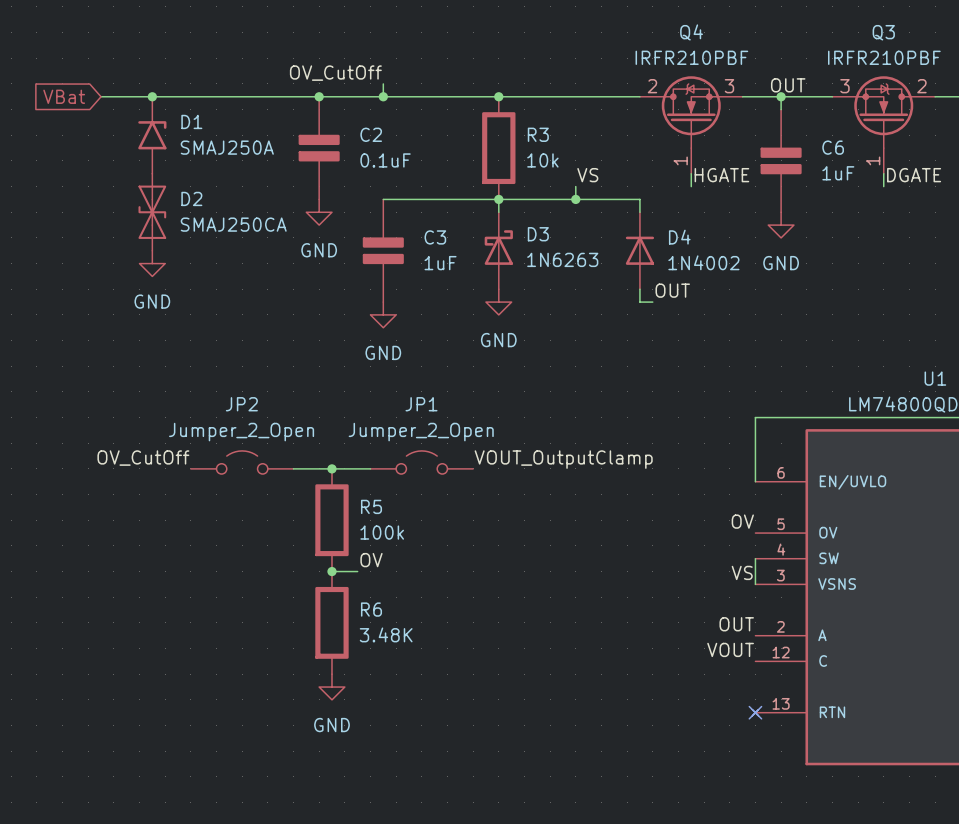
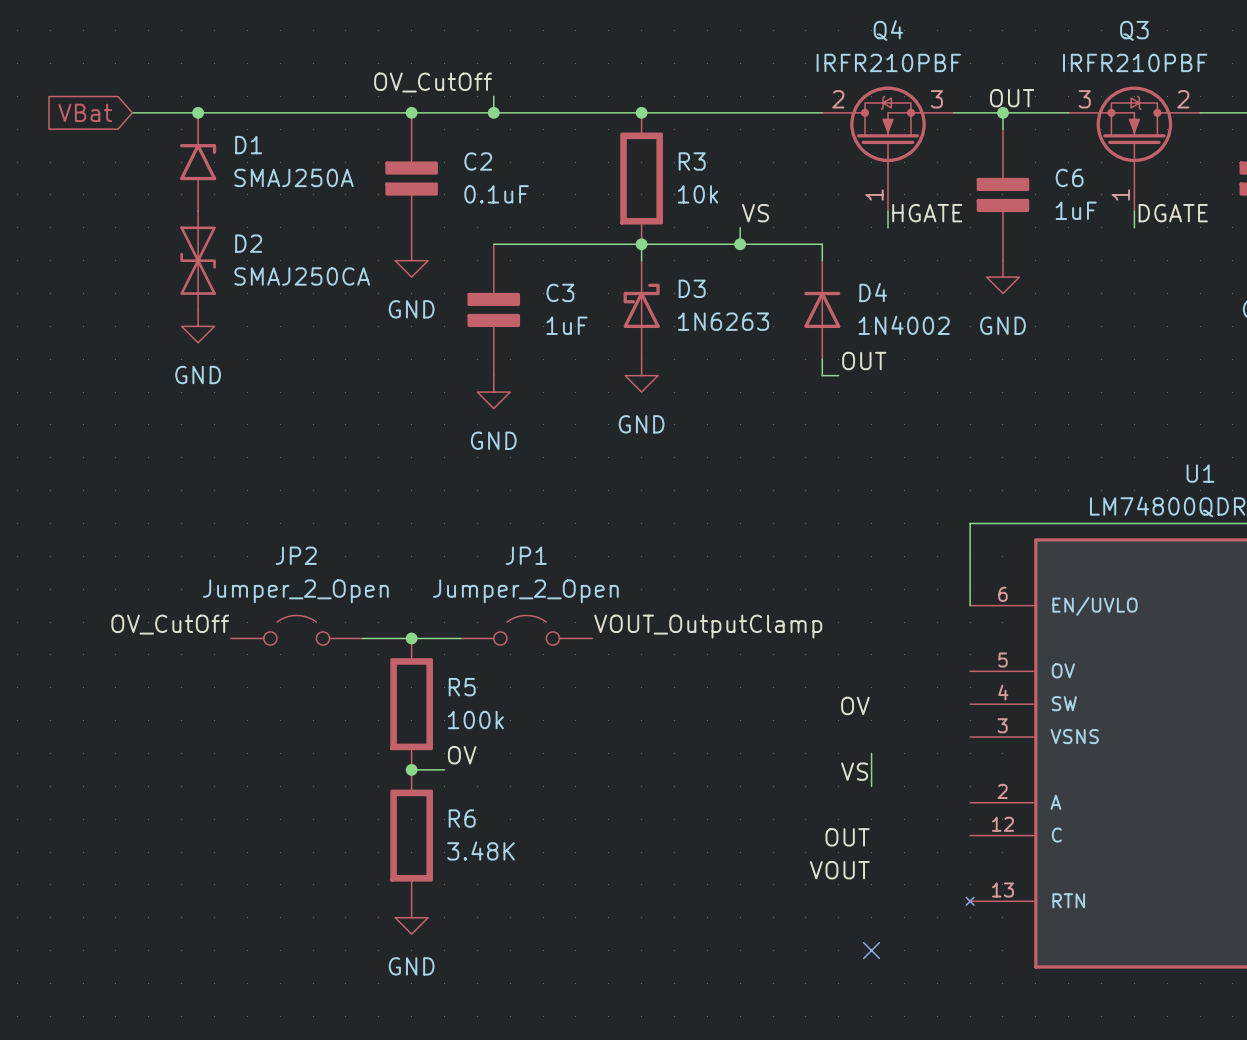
label position: OV_CutOff (143, 458) -> OV_CutOff (170, 624)
label position: VOUT_OutputClamp (563, 459) -> VOUT_OutputClamp (708, 626)
JP2 position: (242, 462) -> (296, 630)
JP1 position: (421, 462) -> (526, 630)
wire: (293, 468) (370, 468) -> (362, 638) (460, 638)
junction: (331, 468) -> none
junction: none -> (411, 638)
R5 position: (331, 520) -> (411, 704)
label position: OV (742, 521) -> OV (855, 705)
wire: (755, 558) (755, 584) -> (871, 753) (871, 786)
label position: OV (371, 560) -> OV (462, 755)
wire: (331, 571) (357, 571) -> (411, 769) (444, 769)
junction: (331, 571) -> none
label position: VS (742, 572) -> VS (854, 771)
junction: none -> (411, 769)
R6 position: (331, 622) -> (411, 835)
label position: OUT (736, 624) -> OUT (847, 837)
label position: VOUT (730, 649) -> VOUT (839, 870)
power symbol position: GND (331, 687) -> GND (411, 917)
no-connect mark: (755, 712) -> none
no-connect mark: none -> (871, 950)

